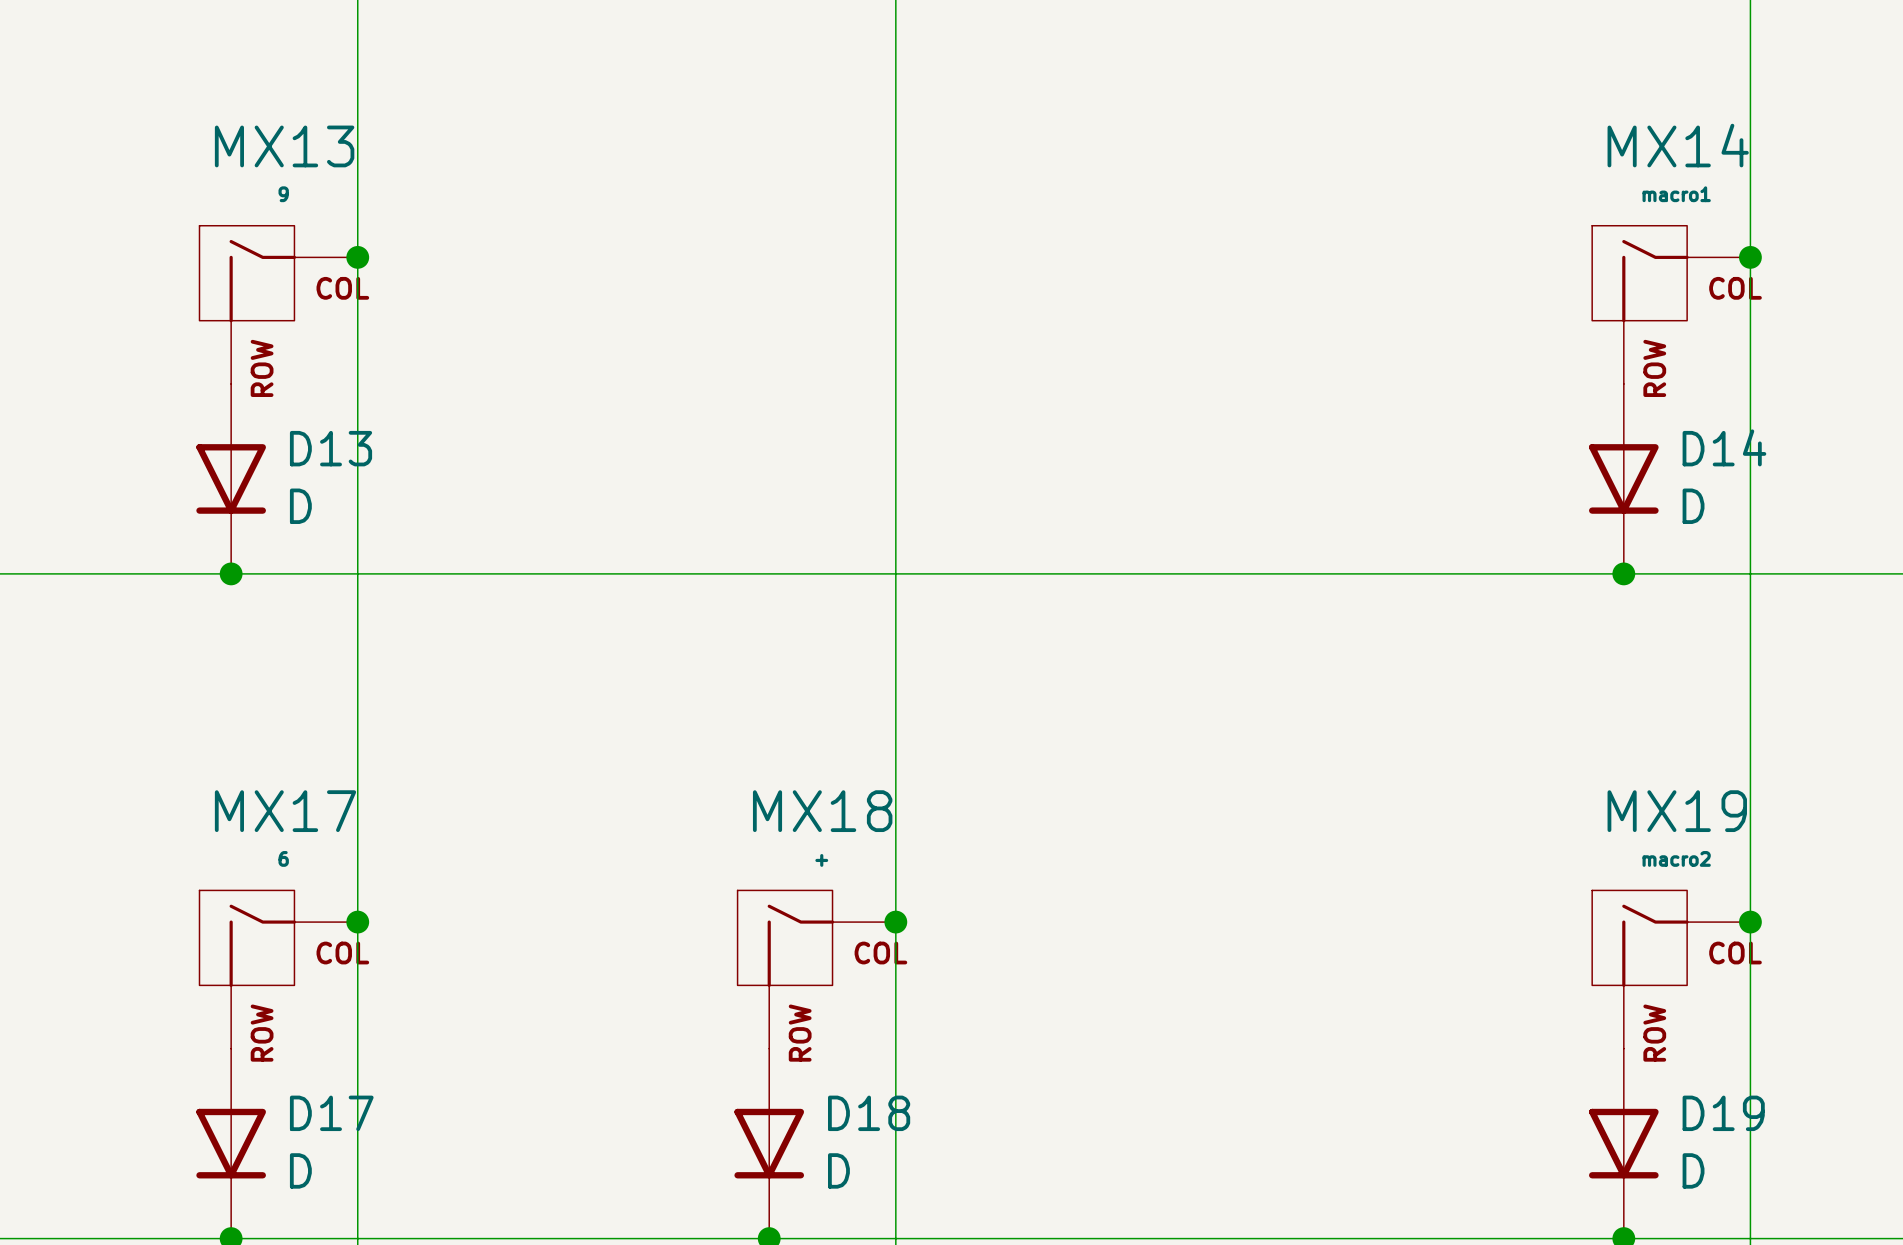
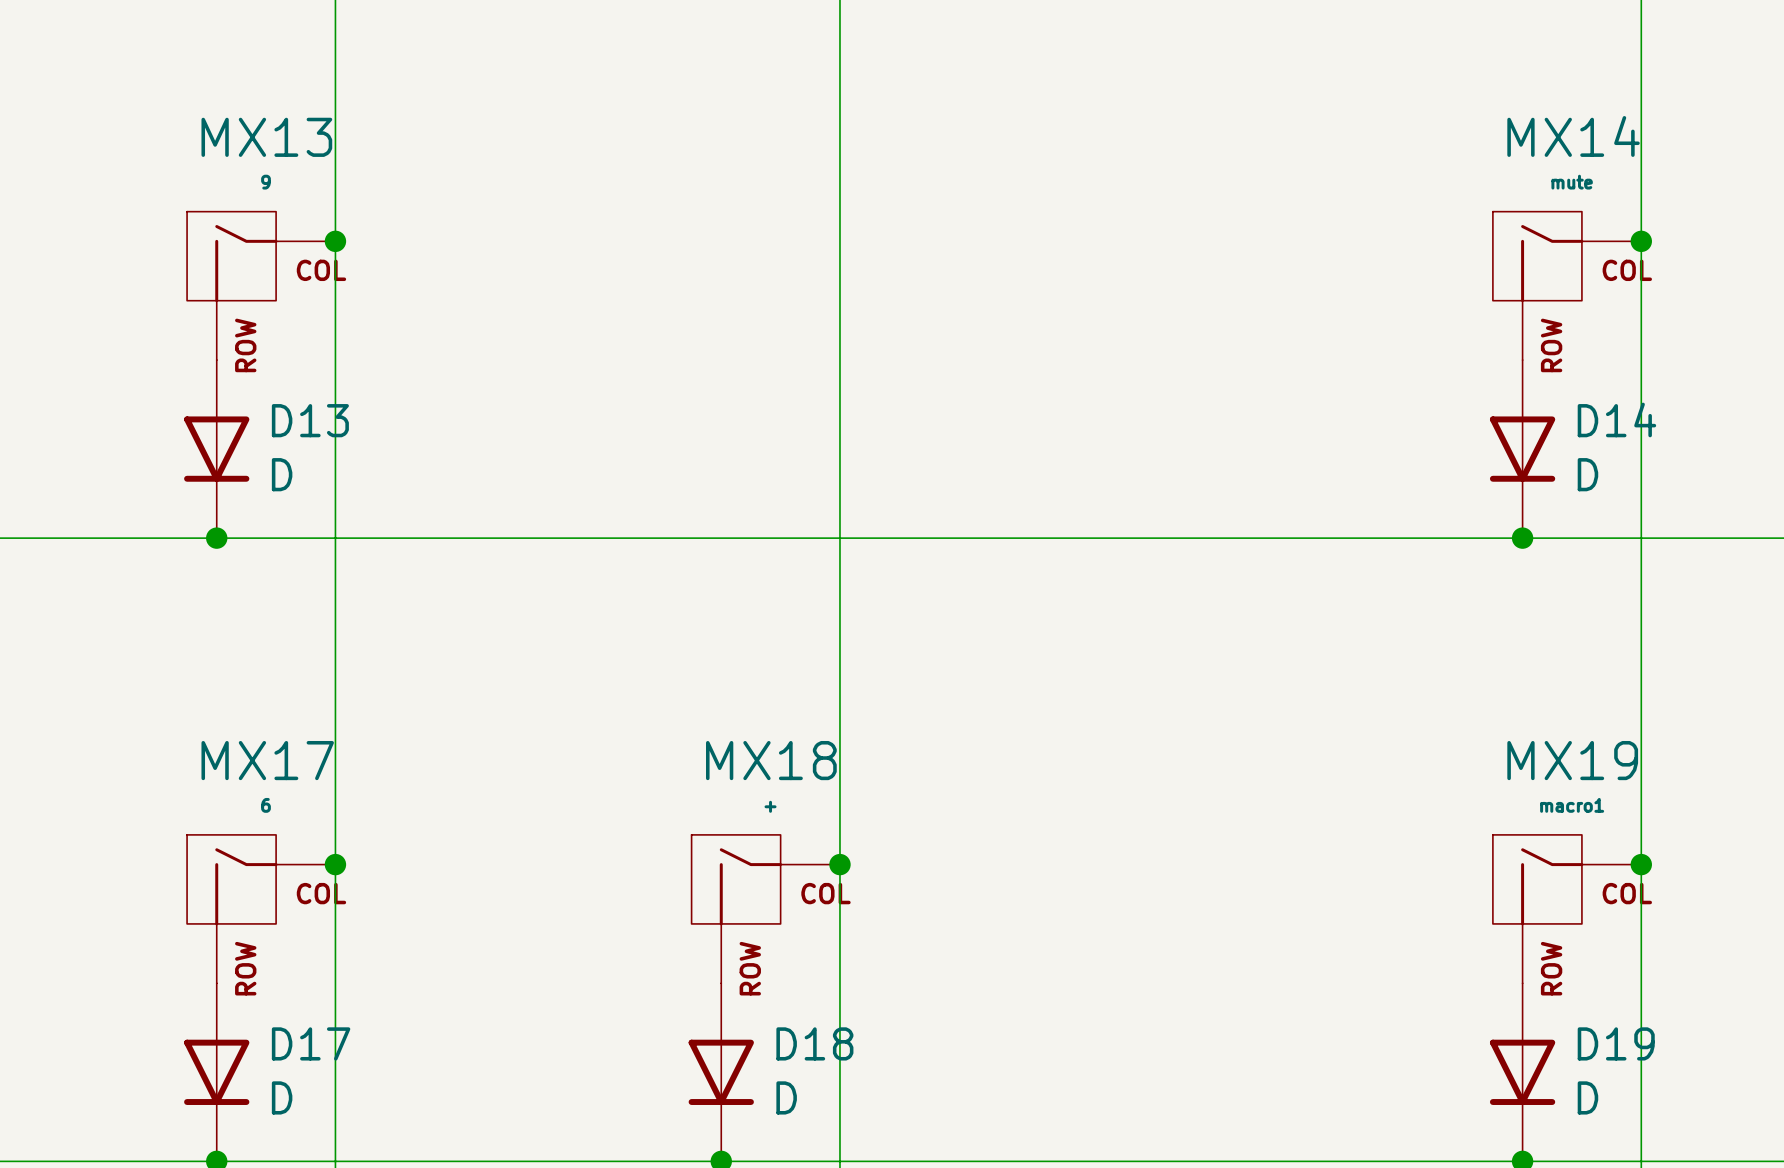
MX14 value: macro1 (1676, 194) -> mute (1572, 182)
MX19 value: macro2 (1676, 858) -> macro1 (1572, 805)

